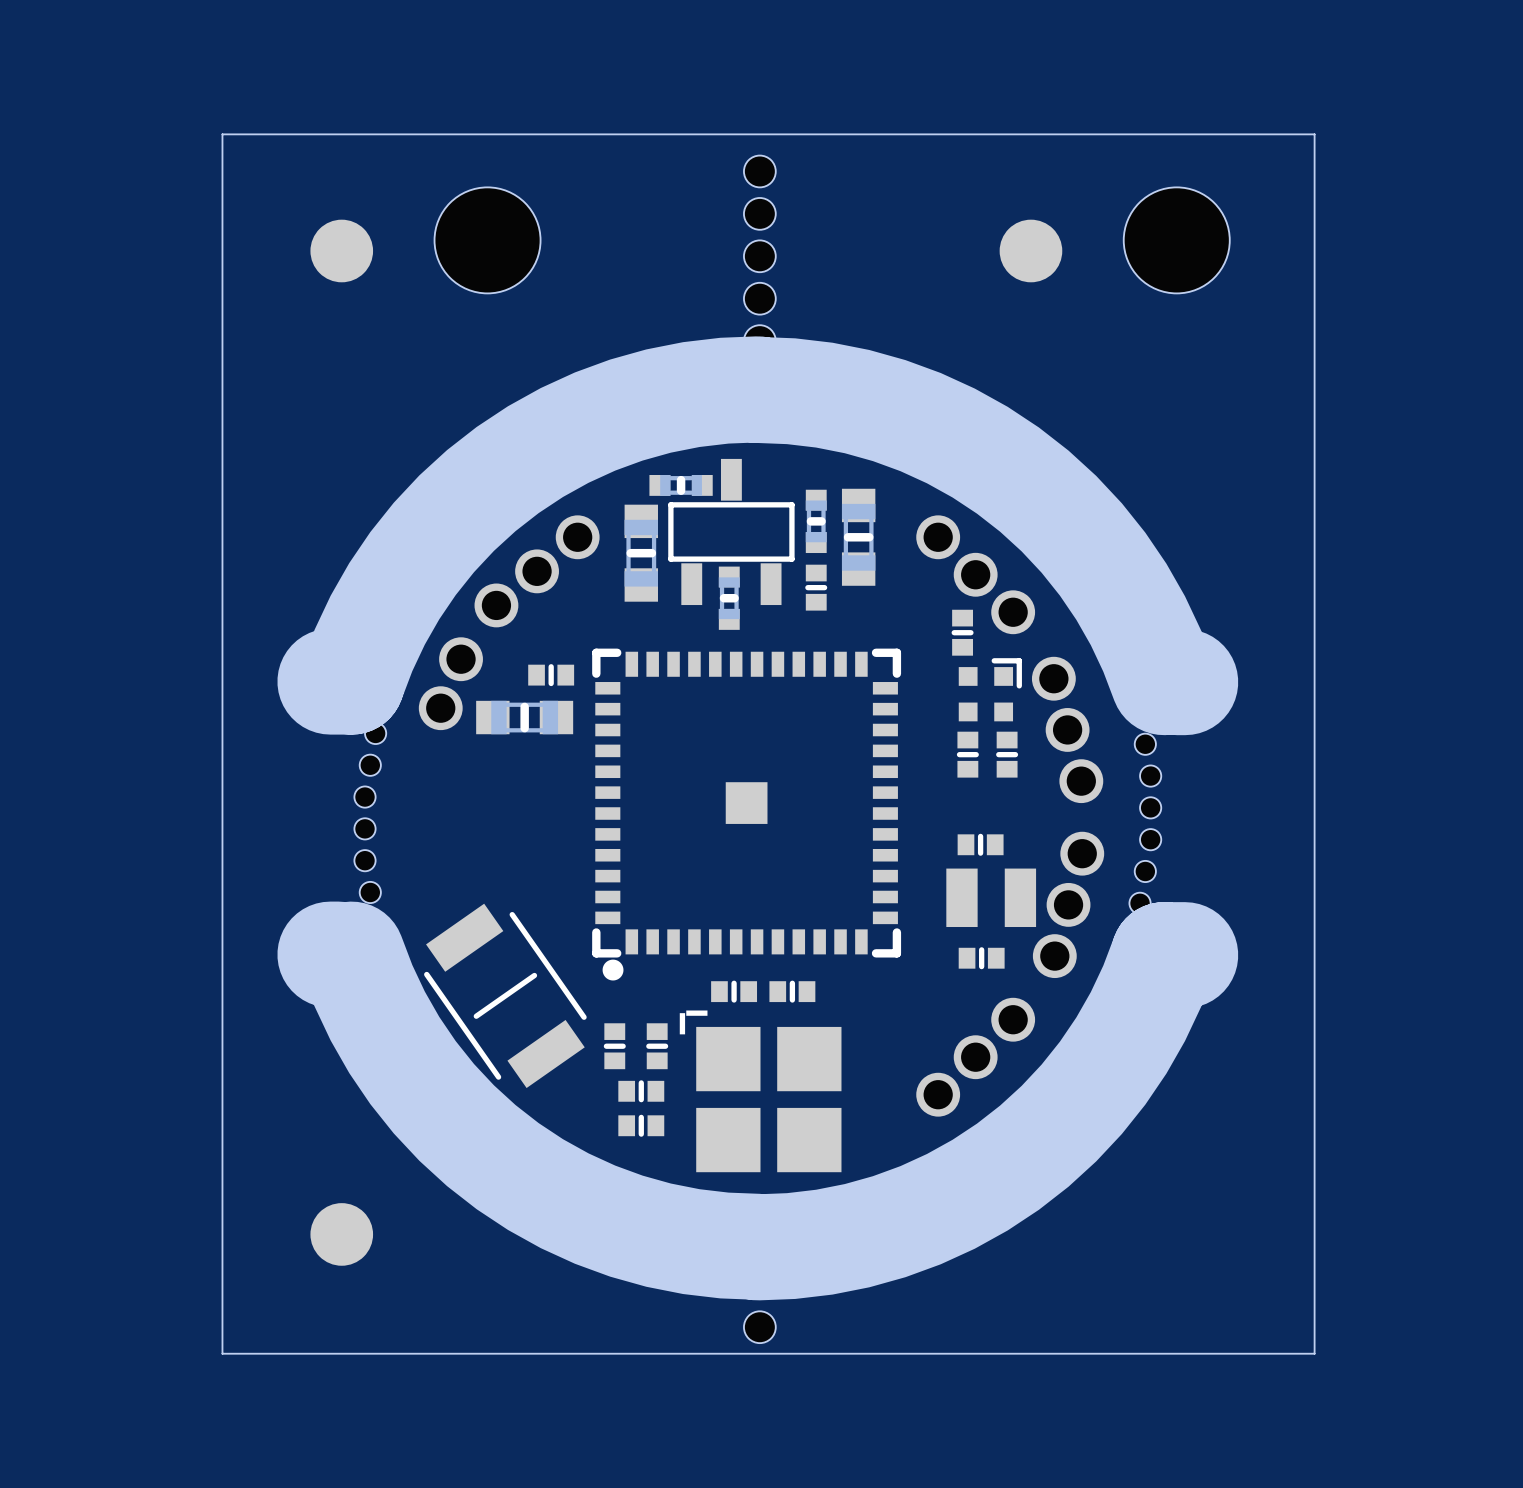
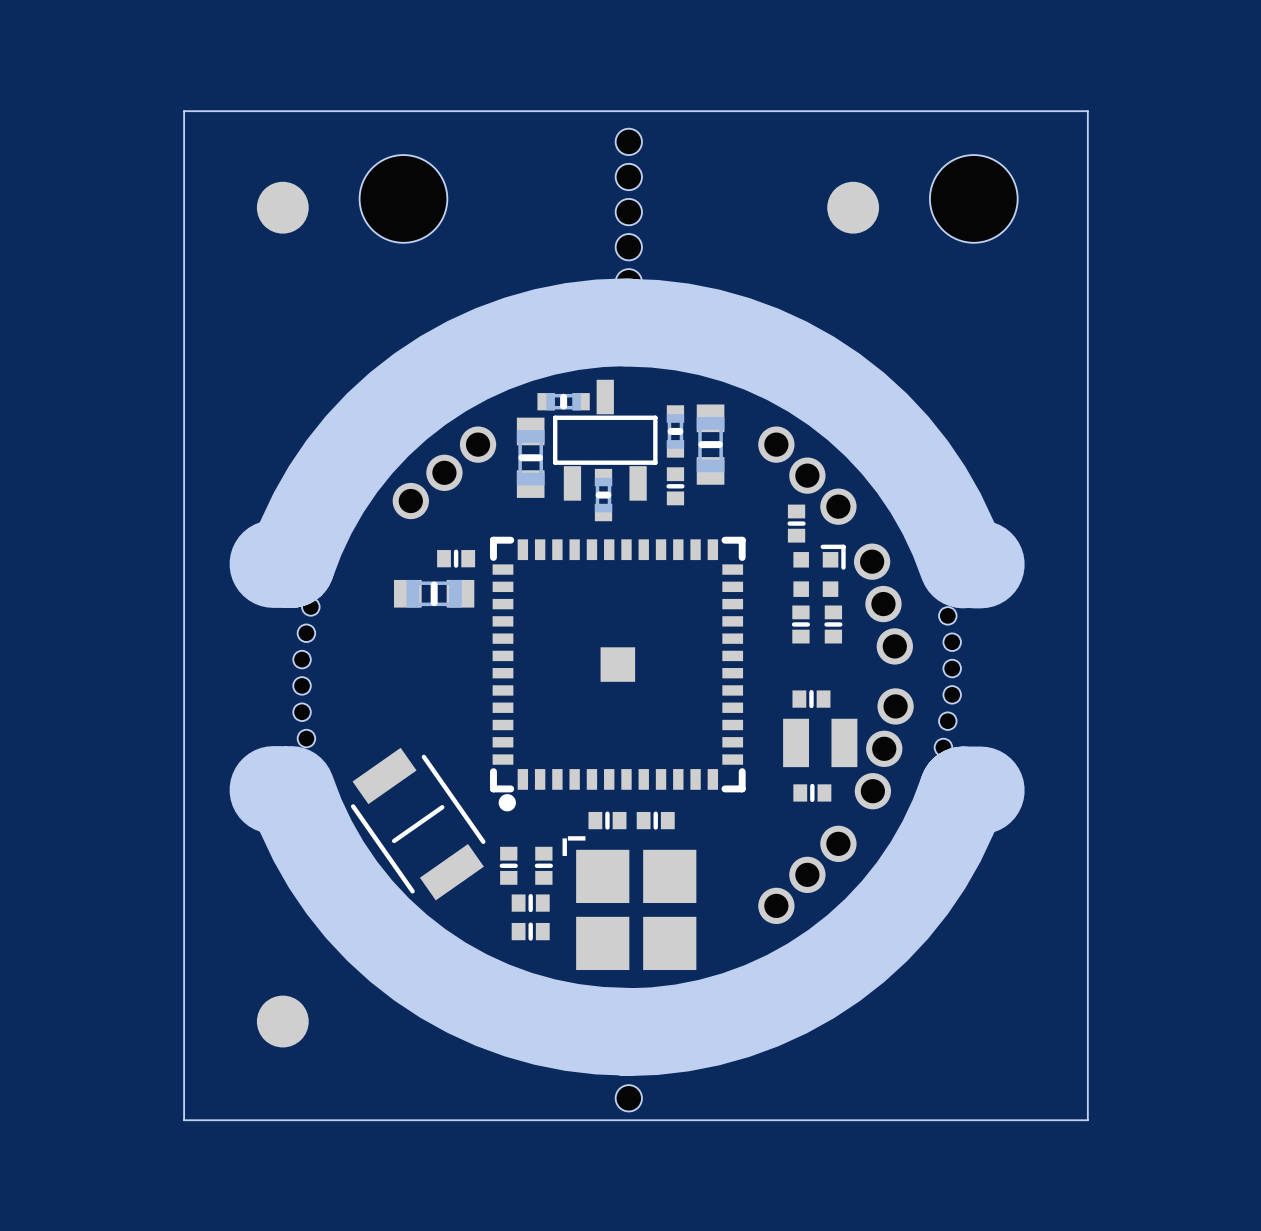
part: (450, 683) -> none

